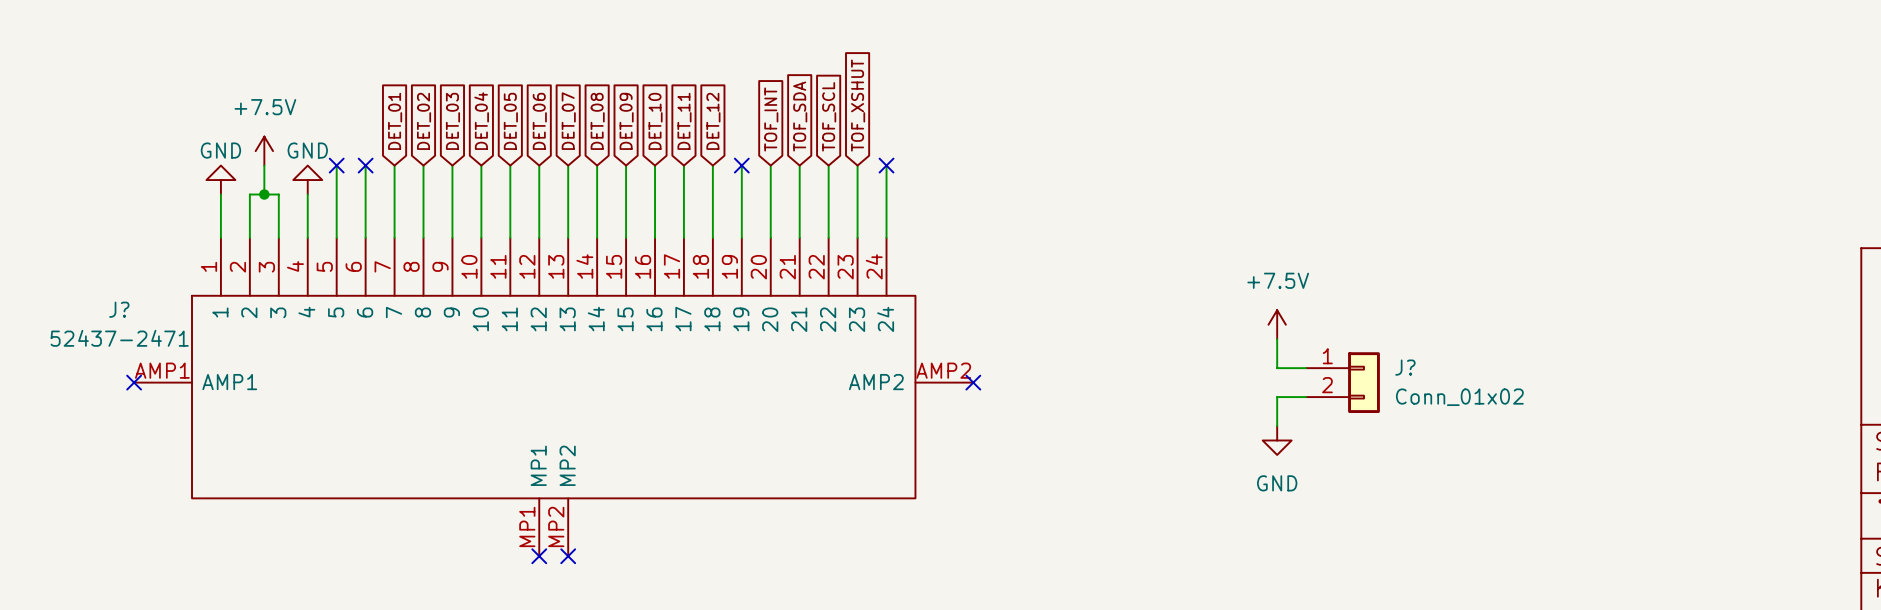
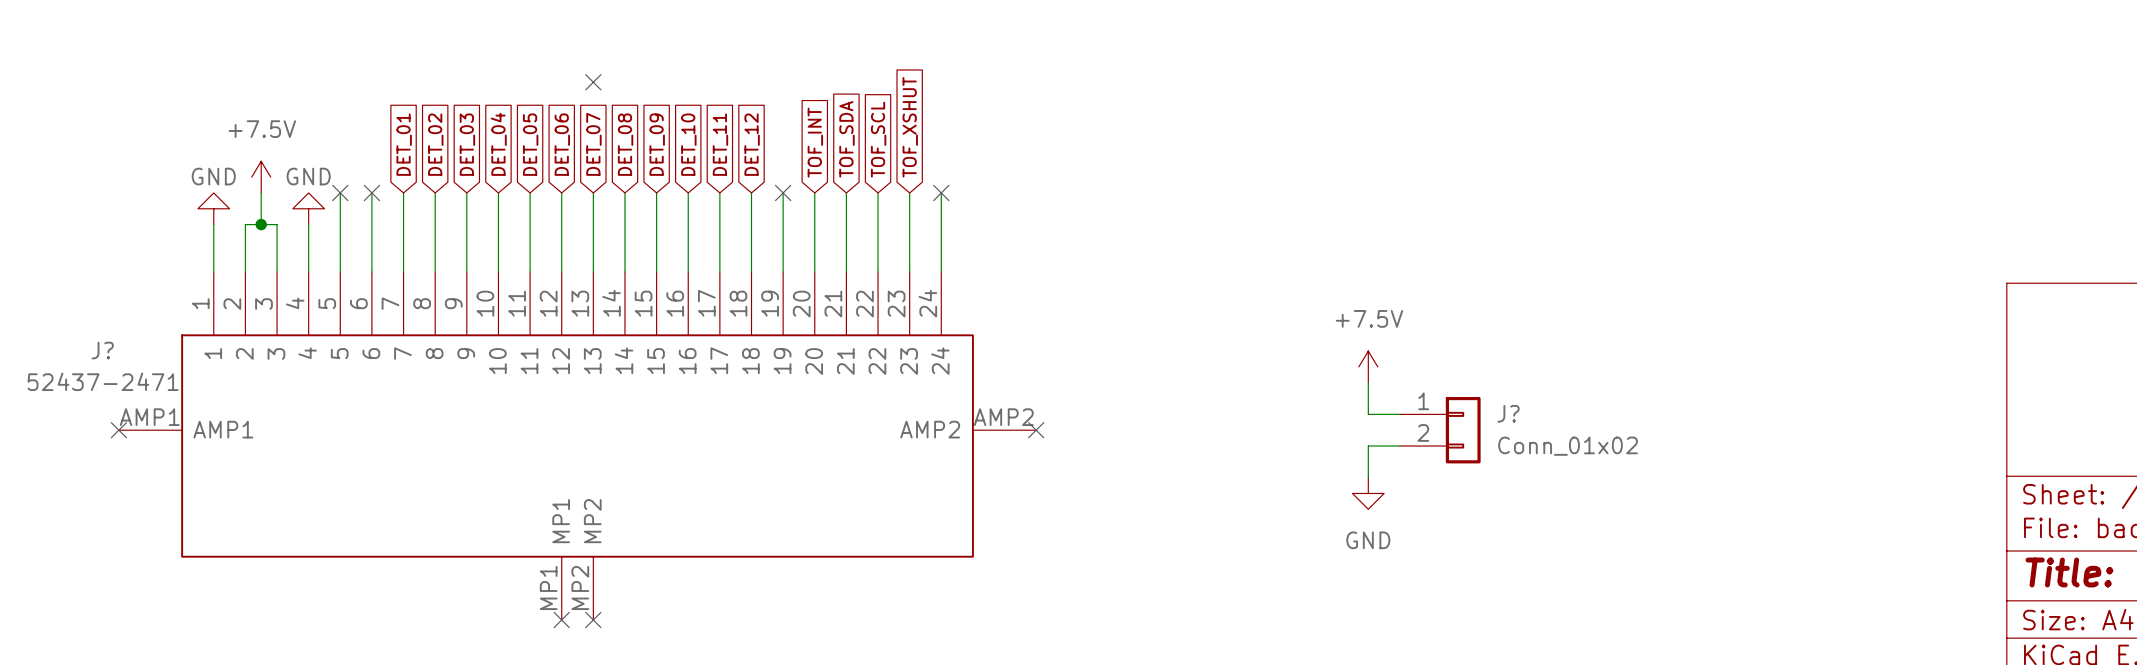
no-connect mark: none -> (593, 82)

